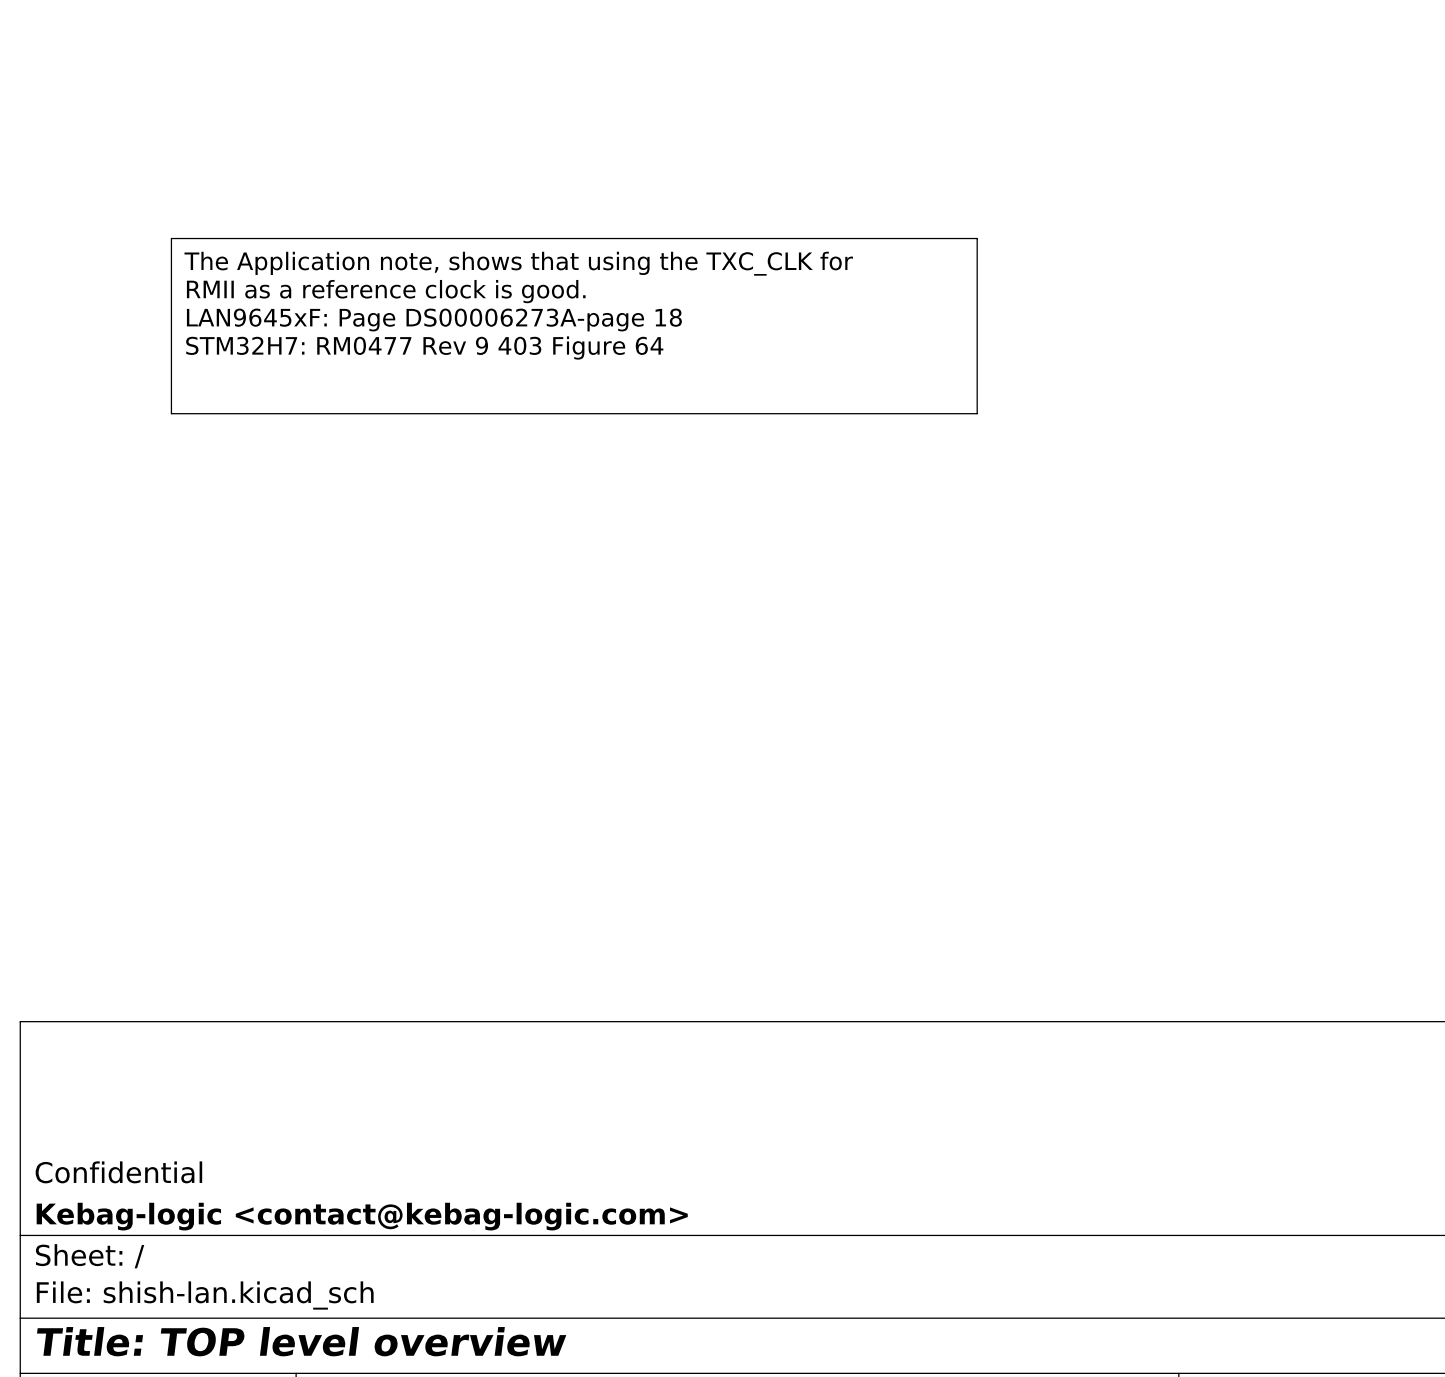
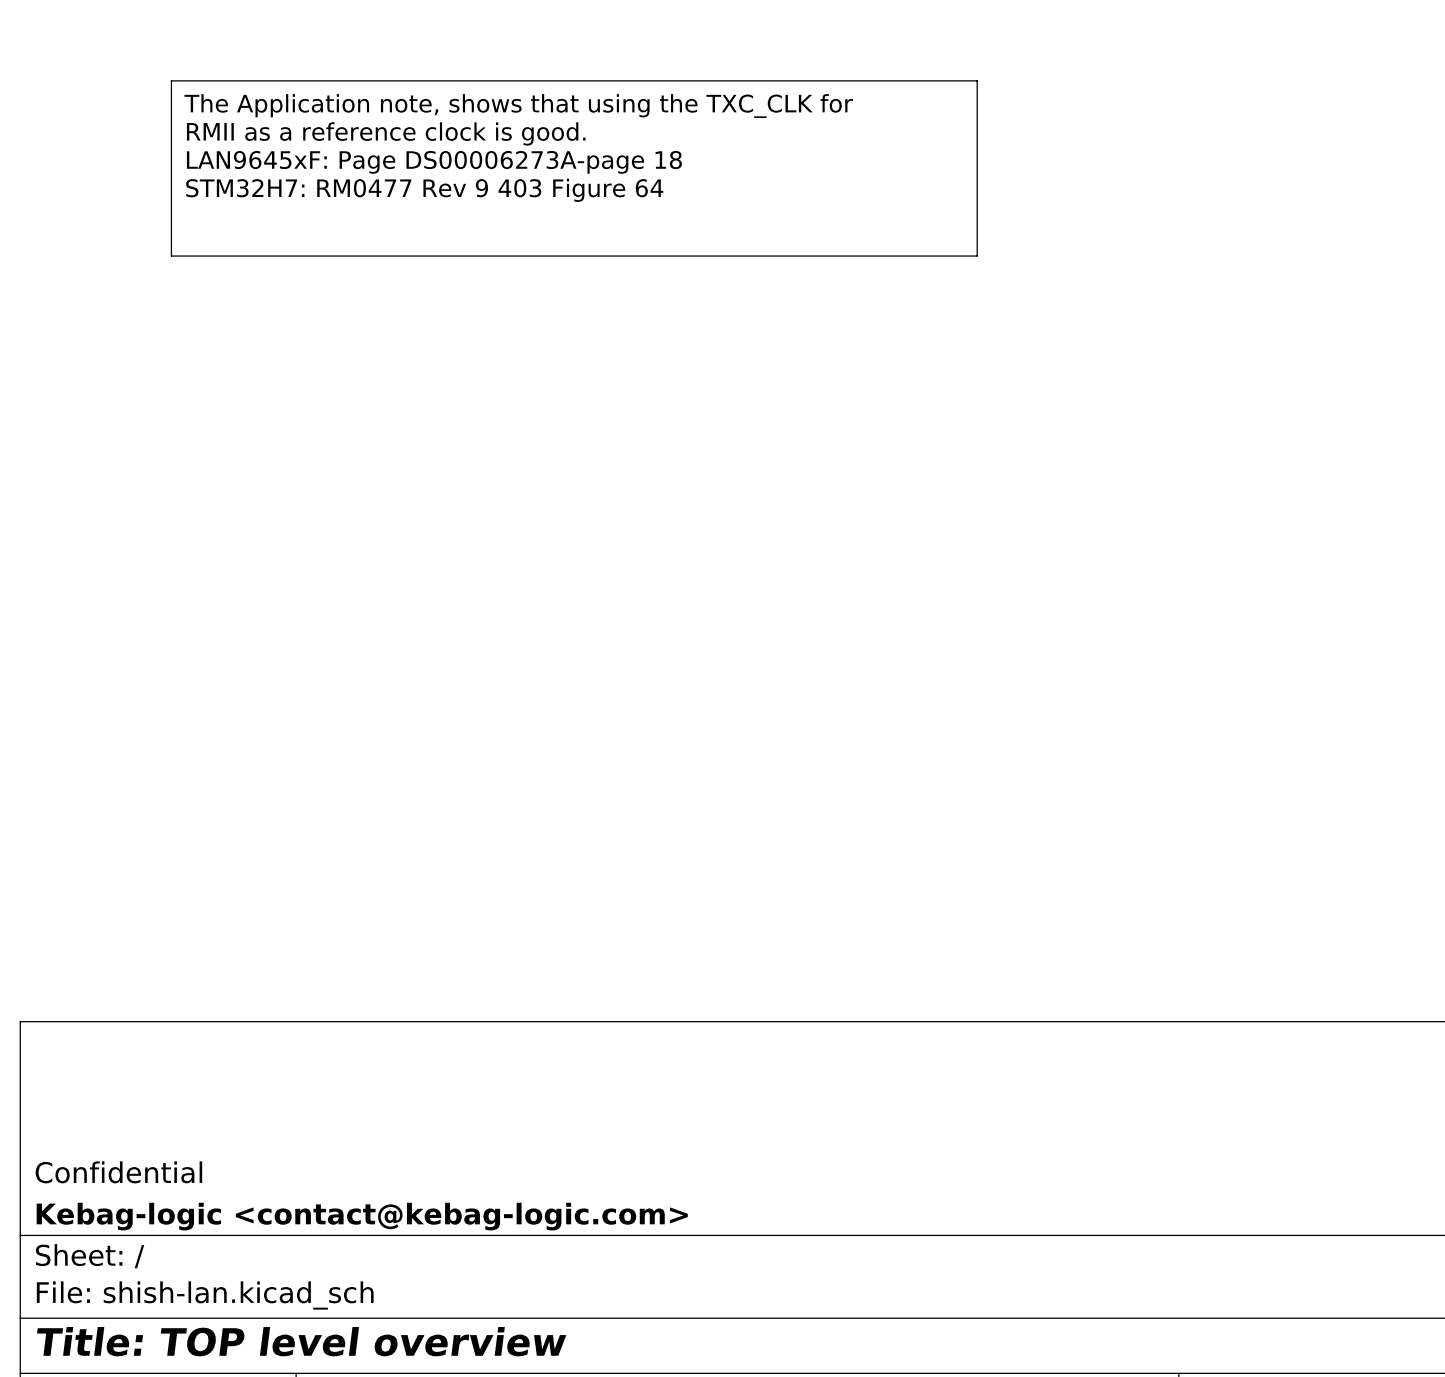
line: (171, 238) (977, 238) -> (171, 238) (171, 80) (977, 80) (977, 238)
line: (171, 256) (171, 413) (977, 413) (977, 256) -> (171, 256) (977, 256)
text position: The Application note, shows that using the TXC_CLK for (518, 263) -> The Application note, shows that using the TXC_CLK for (518, 106)
text position: RMII as a reference clock is good. (386, 291) -> RMII as a reference clock is good. (386, 133)
text position: LAN9645xF: Page DS00006273A-page 18 (434, 320) -> LAN9645xF: Page DS00006273A-page 18 (434, 162)
text position: STM32H7: RM0477 Rev 9 403 Figure 64 (424, 347) -> STM32H7: RM0477 Rev 9 403 Figure 64 (424, 190)

